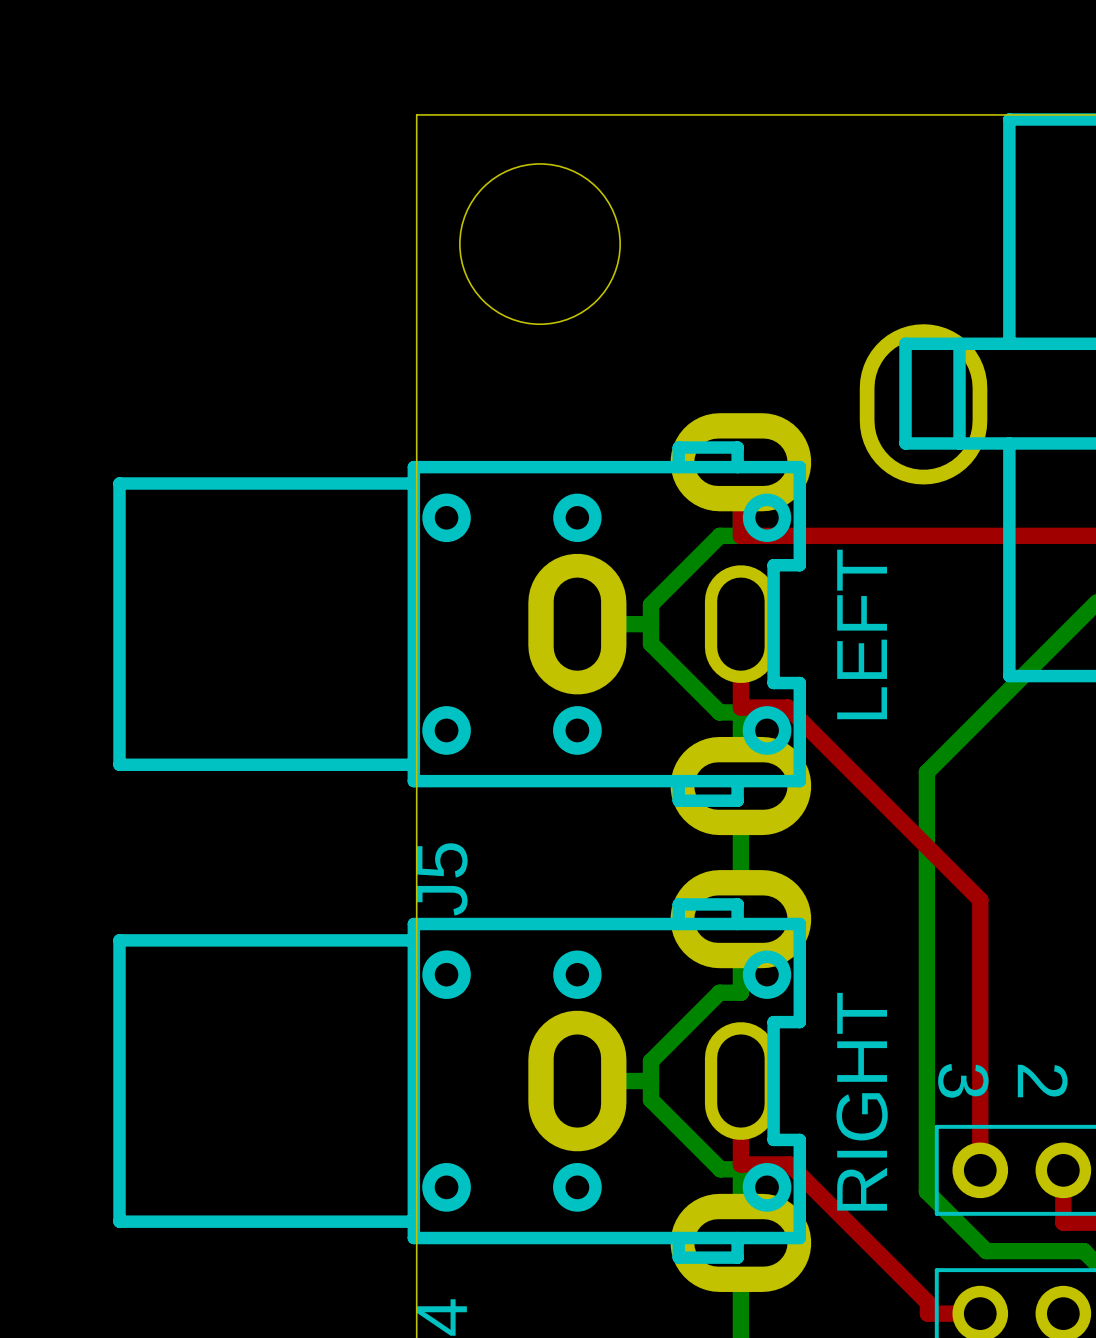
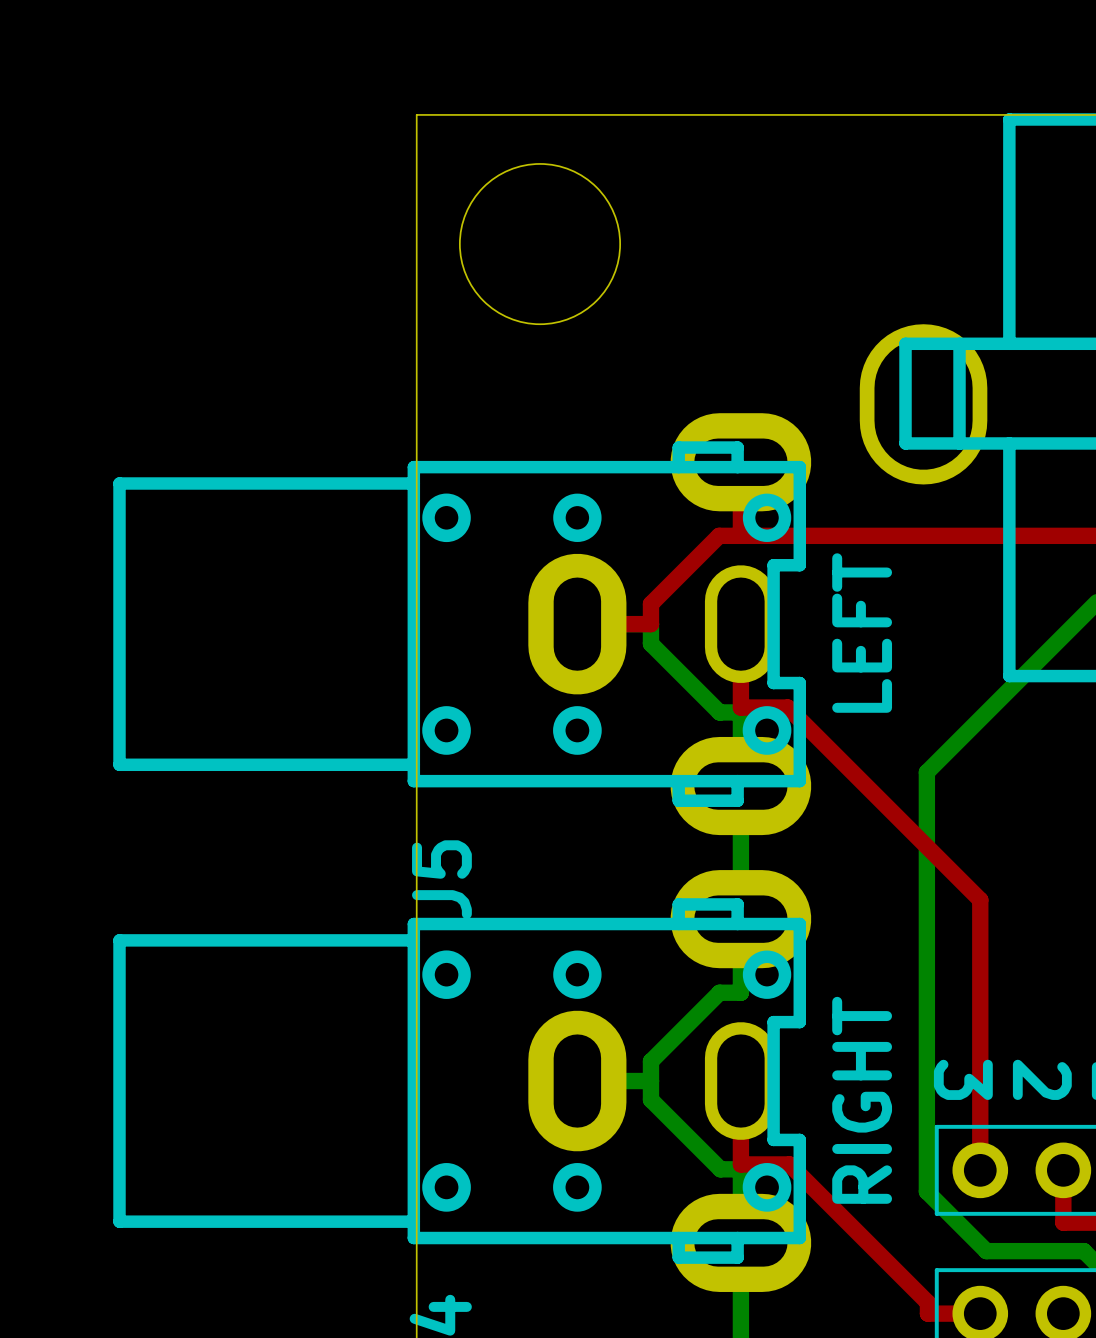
bottom track: (740, 462) (740, 535) (719, 535) (650, 604) (650, 624) -> none
top track: none -> (740, 535) (719, 535) (650, 604) (650, 624) (577, 624)

